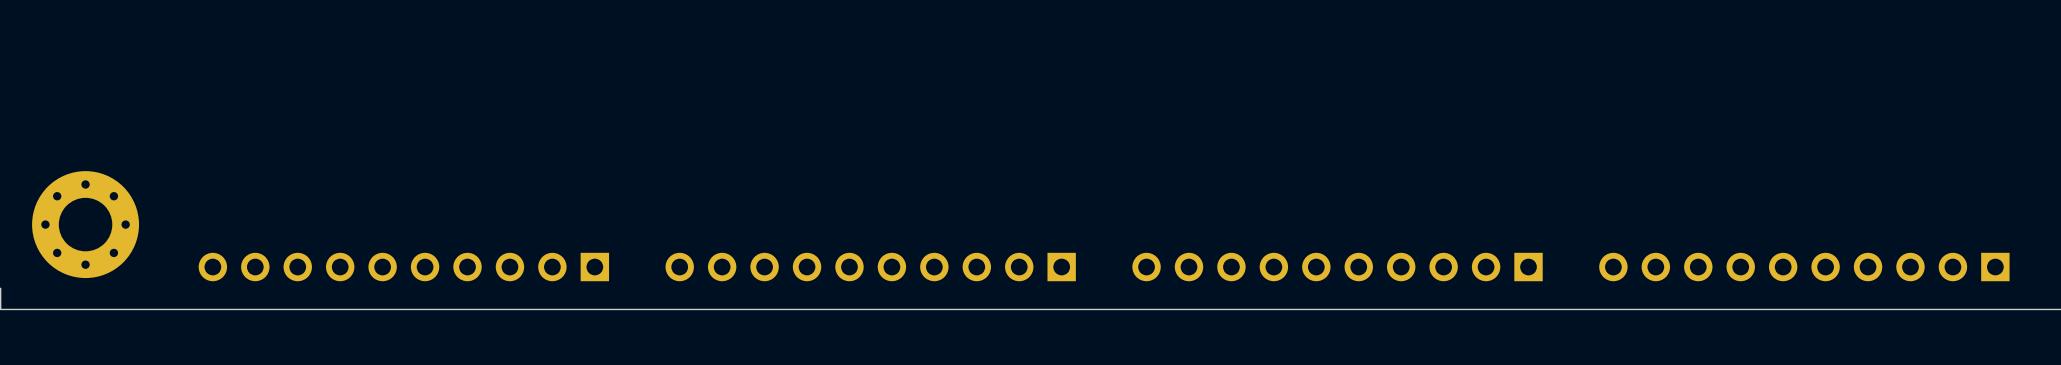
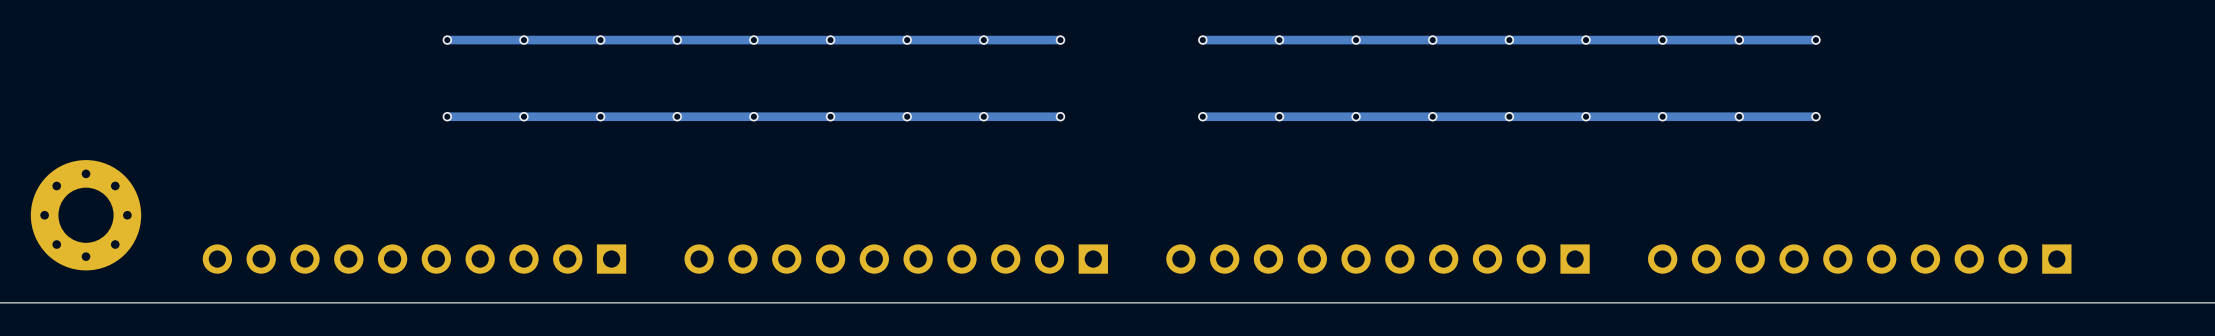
via: none -> (447, 40)
via: none -> (523, 40)
via: none -> (600, 40)
via: none -> (677, 40)
via: none -> (753, 40)
via: none -> (830, 40)
via: none -> (907, 40)
via: none -> (983, 40)
track: none -> (1060, 40) (447, 40)
via: none -> (1060, 40)
via: none -> (1202, 40)
via: none -> (1279, 40)
via: none -> (1356, 40)
via: none -> (1432, 40)
via: none -> (1509, 40)
via: none -> (1586, 40)
via: none -> (1662, 40)
via: none -> (1739, 40)
track: none -> (1815, 40) (1202, 40)
via: none -> (1815, 40)
via: none -> (447, 116)
via: none -> (523, 116)
via: none -> (600, 116)
via: none -> (677, 116)
via: none -> (753, 116)
via: none -> (830, 116)
via: none -> (907, 116)
via: none -> (983, 116)
track: none -> (1060, 116) (447, 116)
via: none -> (1060, 116)
via: none -> (1202, 116)
via: none -> (1279, 116)
via: none -> (1356, 116)
via: none -> (1432, 116)
via: none -> (1509, 116)
via: none -> (1586, 116)
via: none -> (1662, 116)
via: none -> (1739, 116)
track: none -> (1815, 116) (1202, 116)
via: none -> (1815, 116)

